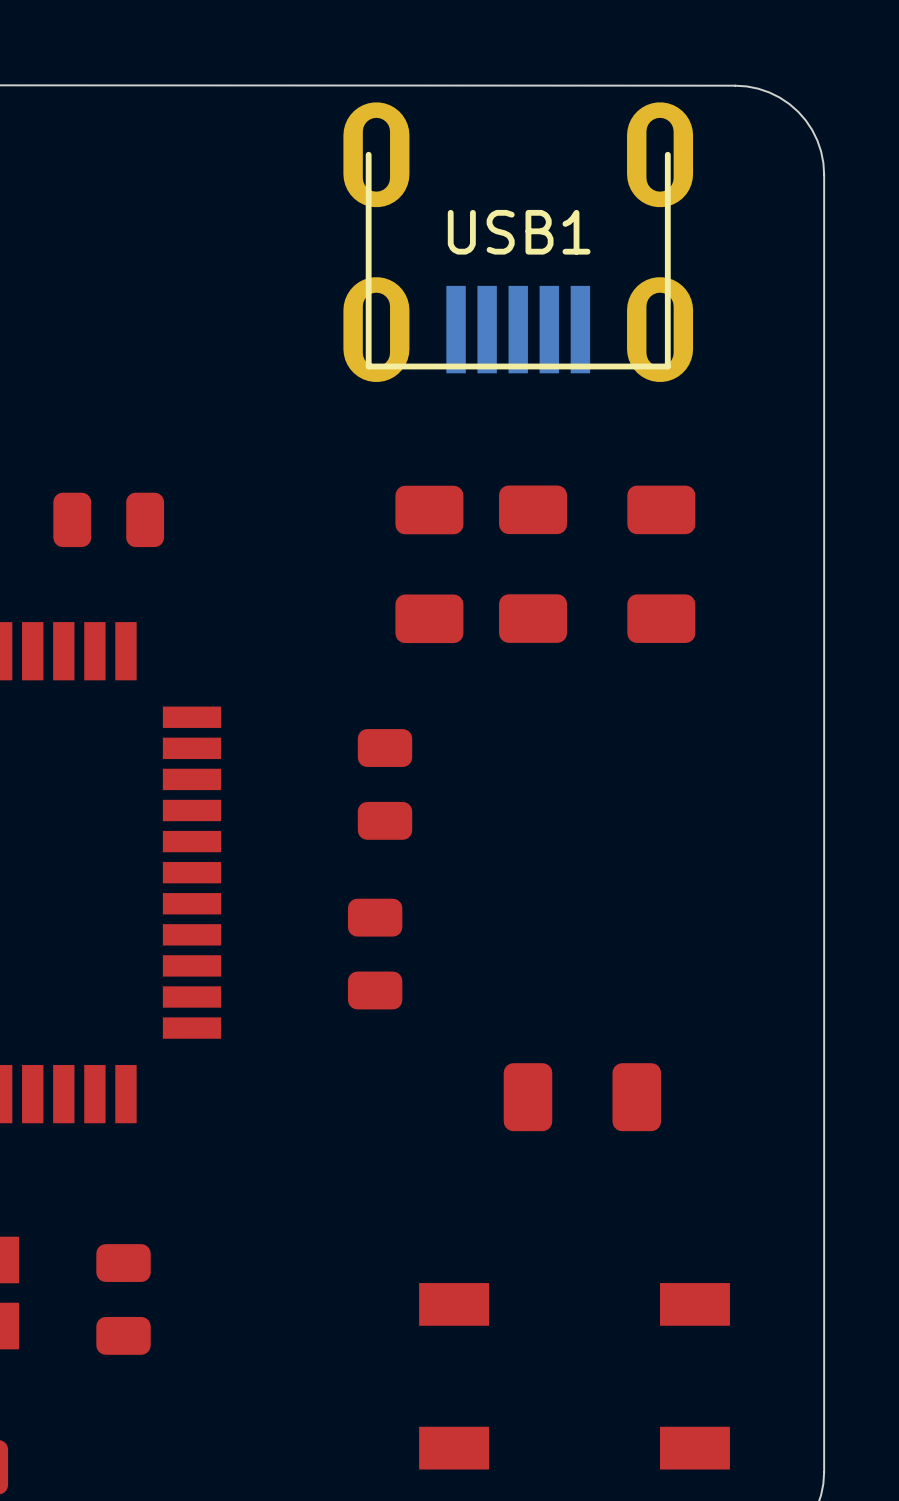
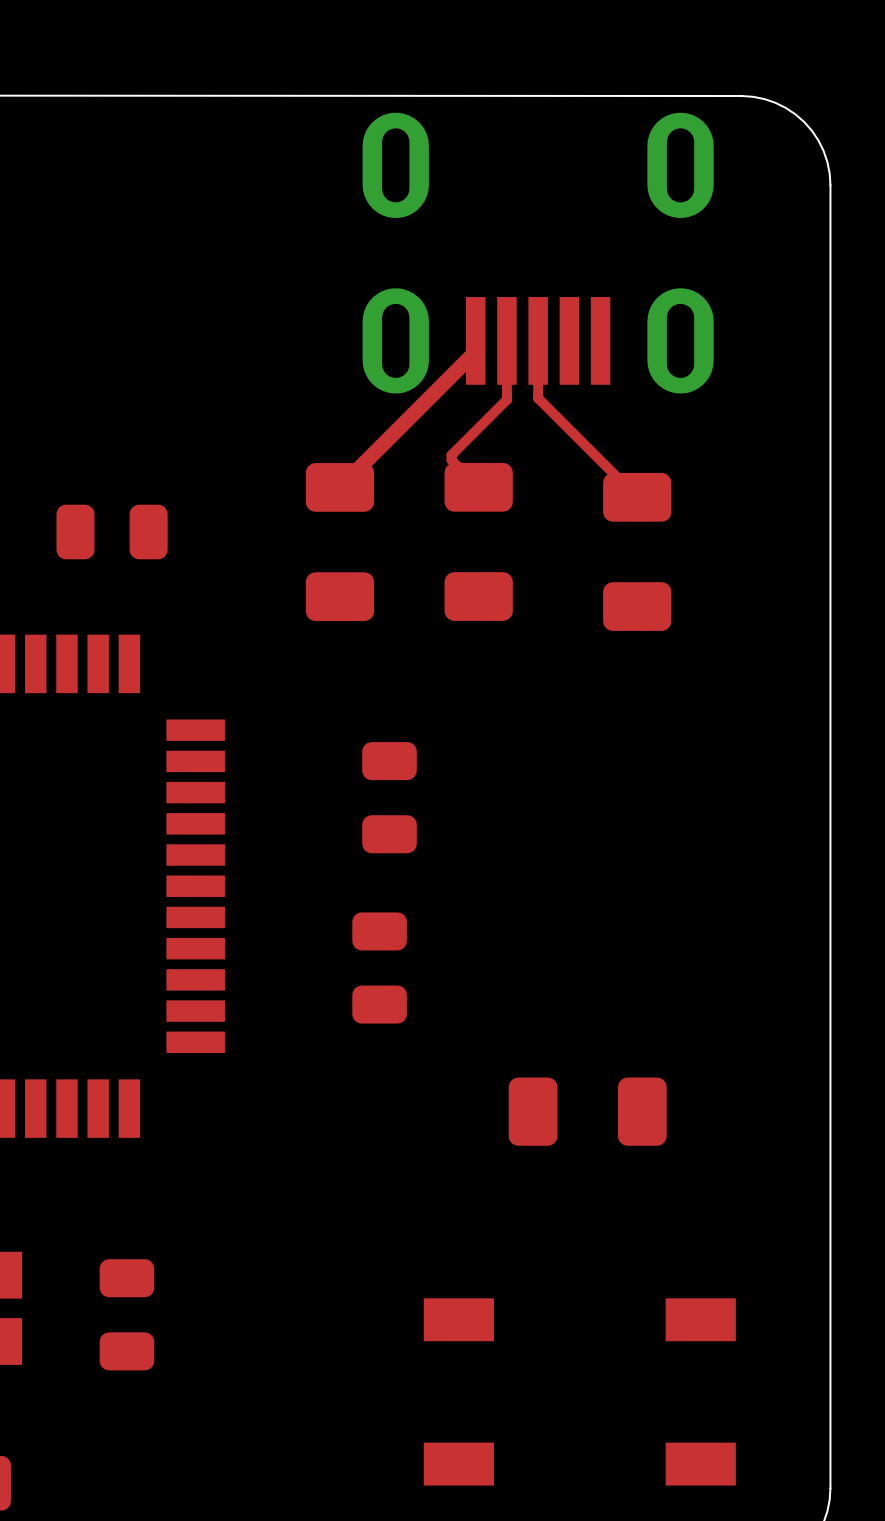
USB1 side: bottom (518, 242) -> top (538, 253)
top track: none -> (475, 340) (475, 351) (339, 487)
top track: none -> (506, 340) (506, 399) (451, 455) (451, 460) (478, 487)
top track: none -> (538, 340) (538, 398) (637, 497)
part: none -> (339, 542)
part: none -> (478, 541)
part: (429, 564) -> none
part: (533, 564) -> none
part position: (661, 564) -> (637, 551)

